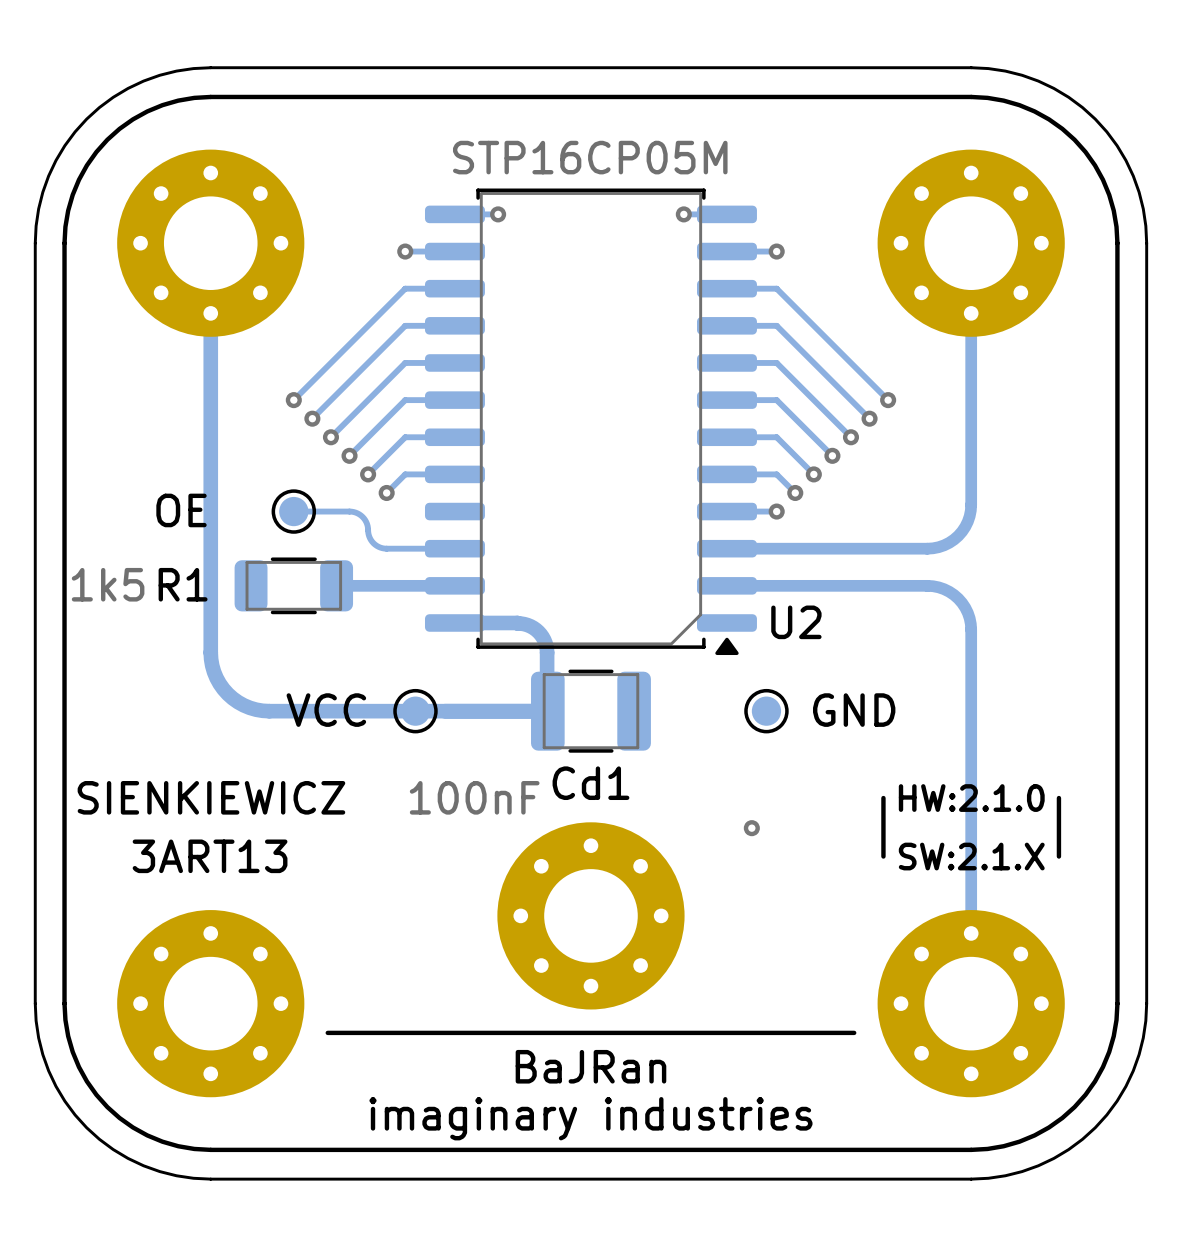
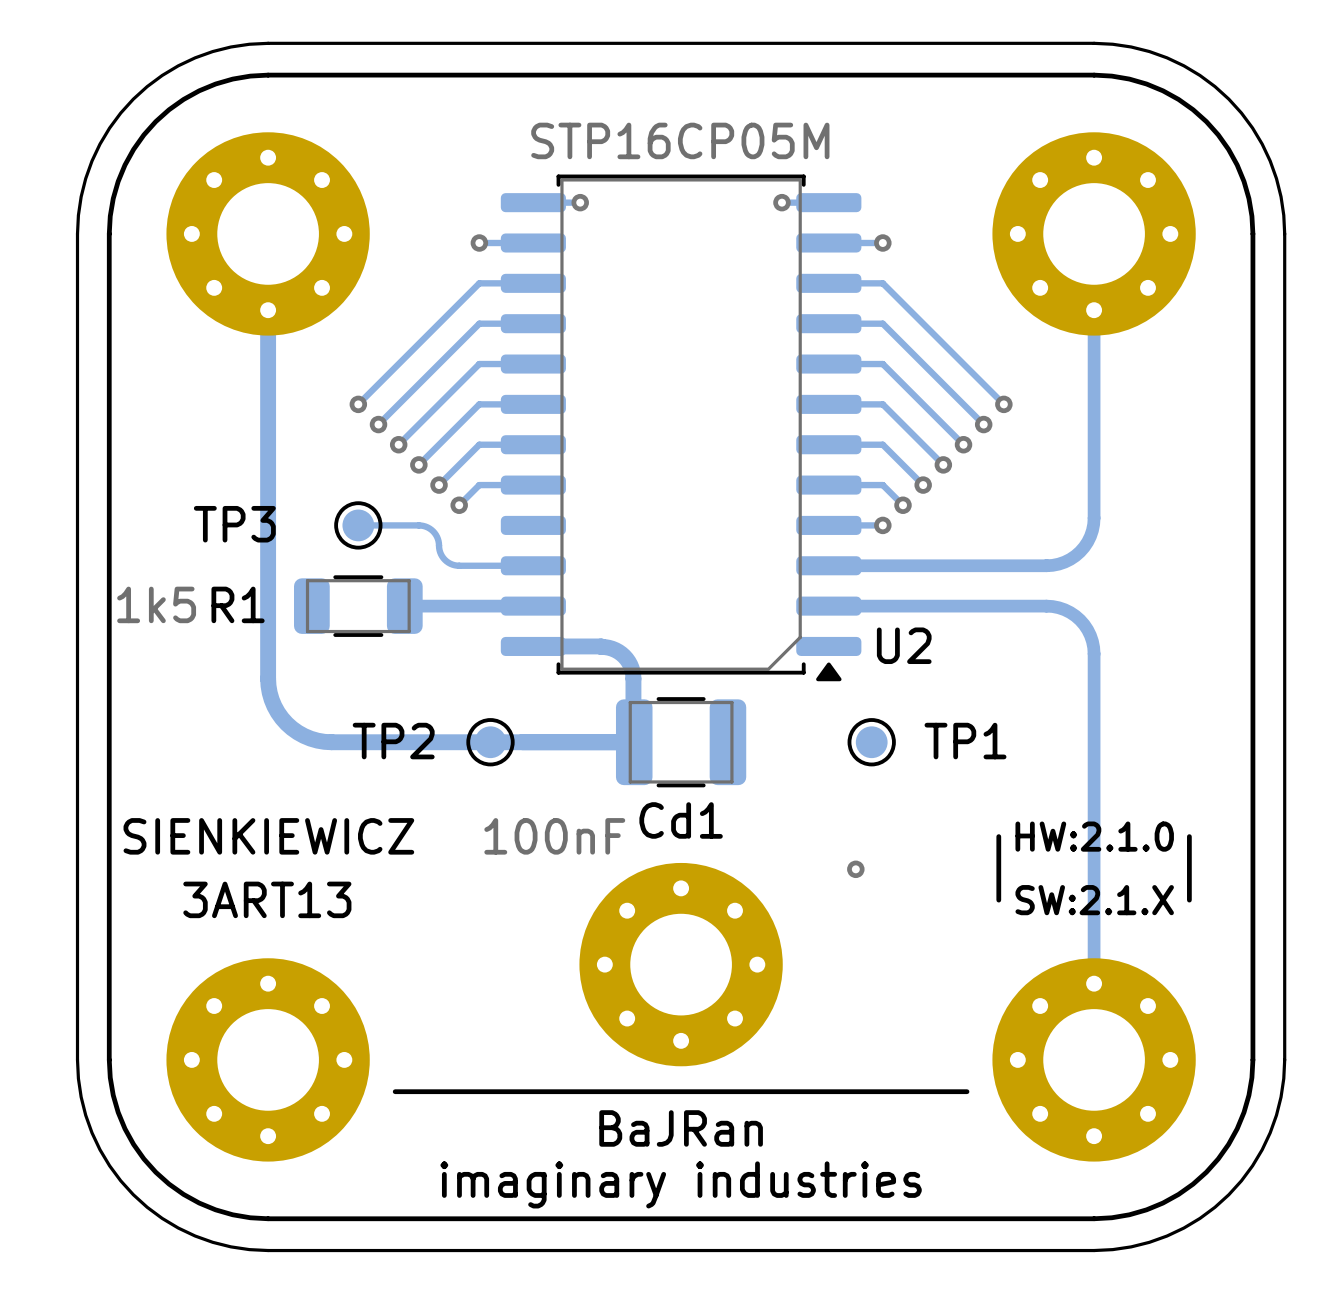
OE name: OE (181, 510) -> TP3 (234, 524)
VCC name: VCC (326, 710) -> TP2 (393, 741)
GND name: GND (854, 710) -> TP1 (965, 741)

